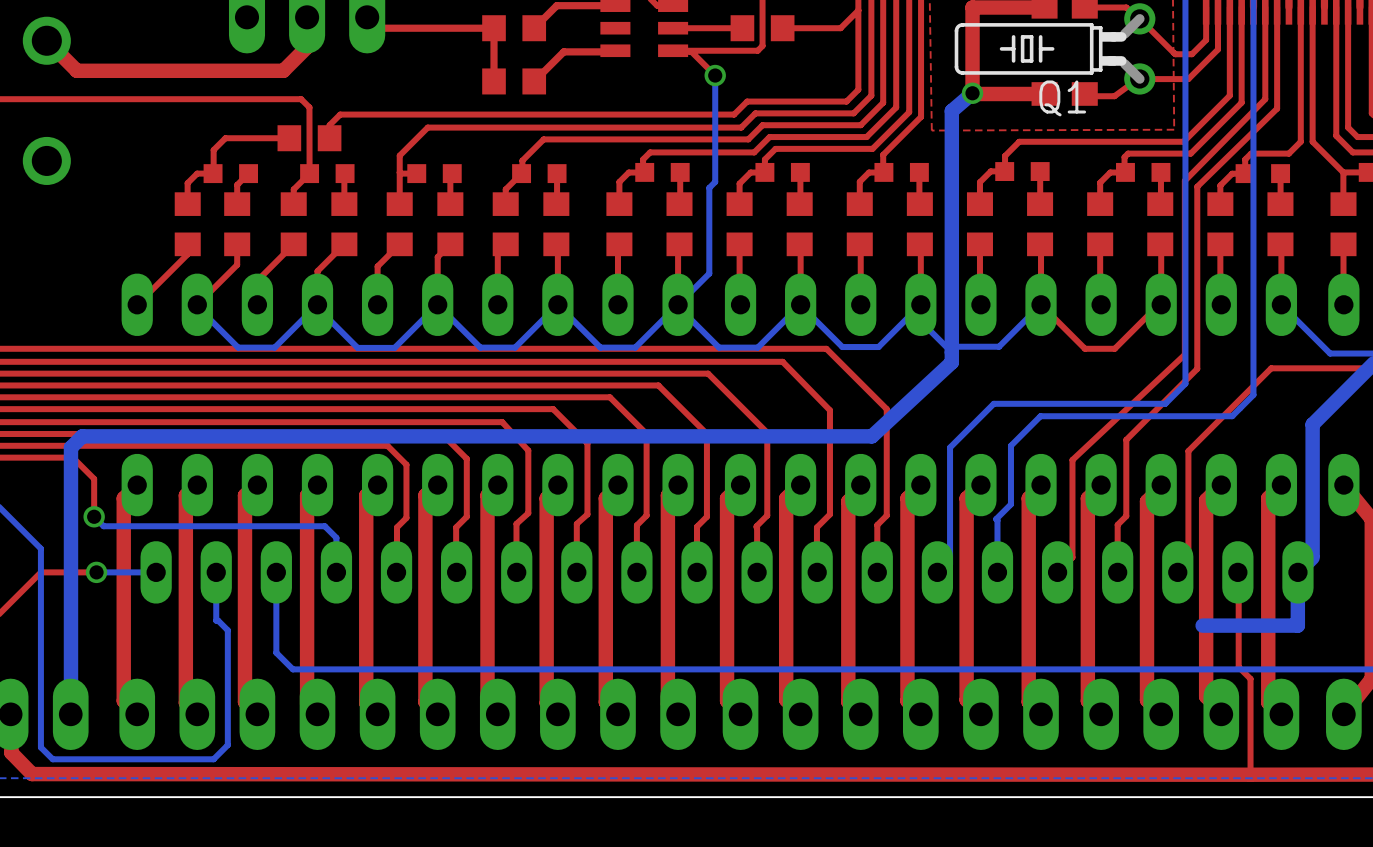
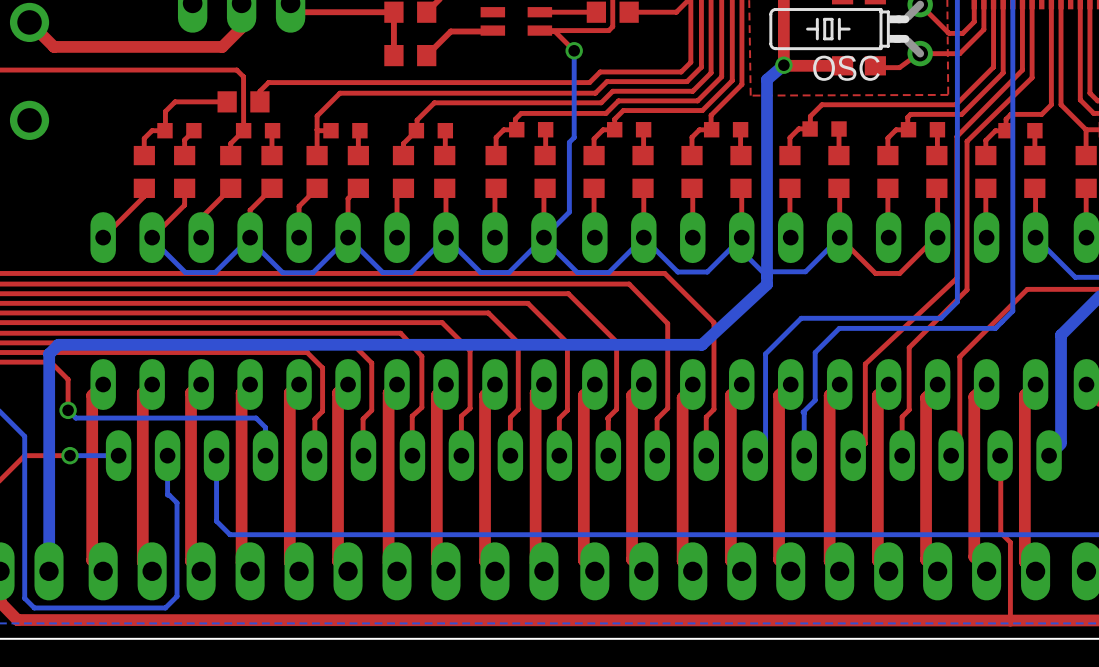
Q1 name: Q1 (1062, 98) -> OSC (846, 68)
bottom track: (1297, 572) (1297, 625) (1202, 625) -> none

